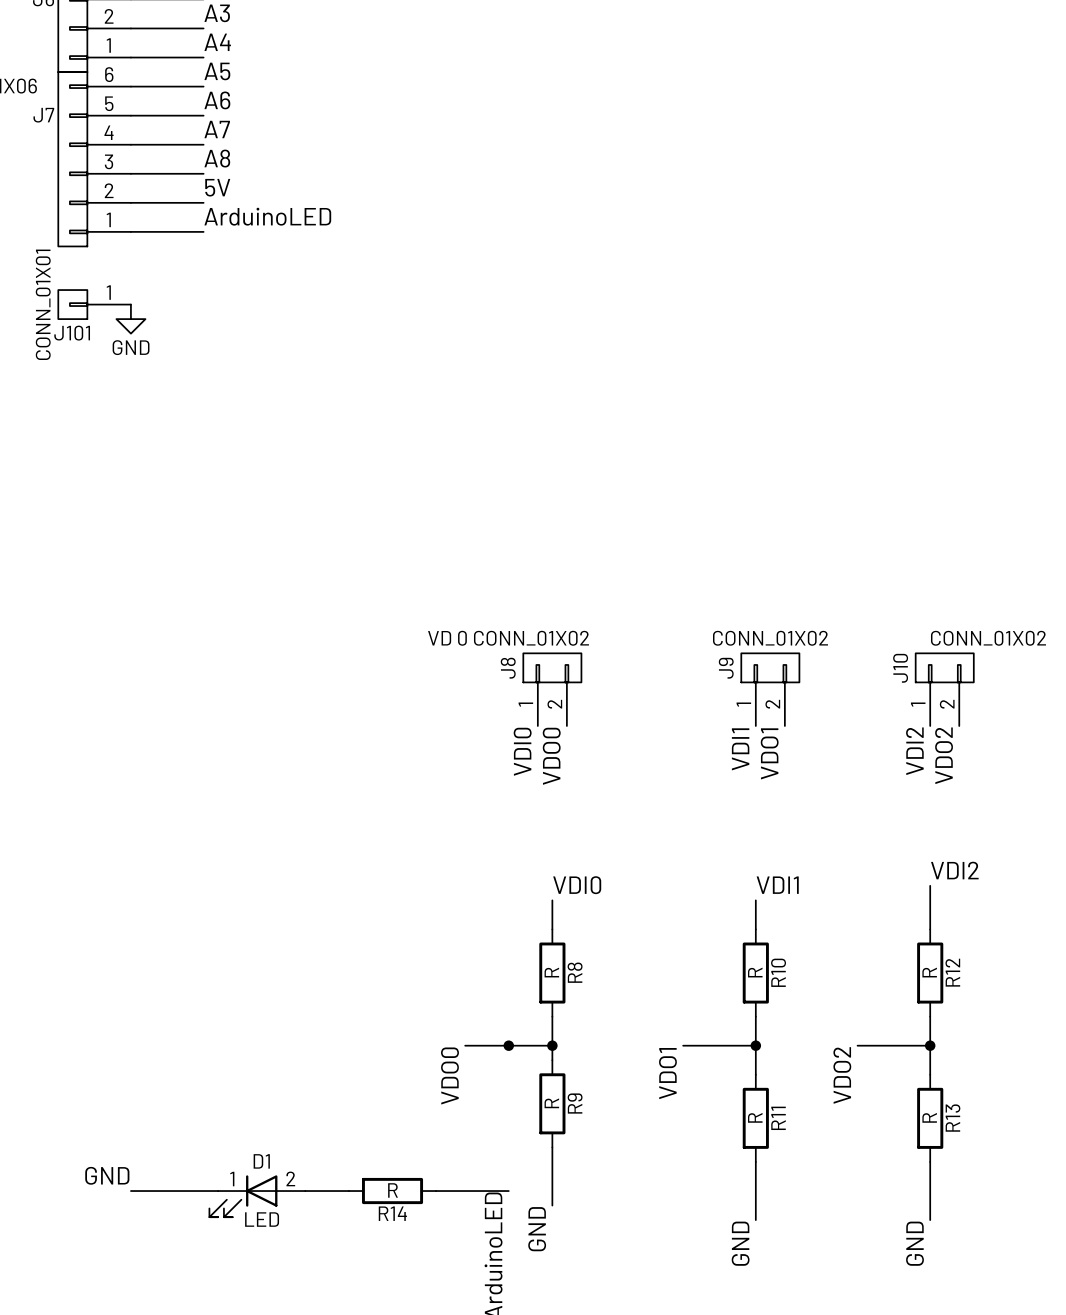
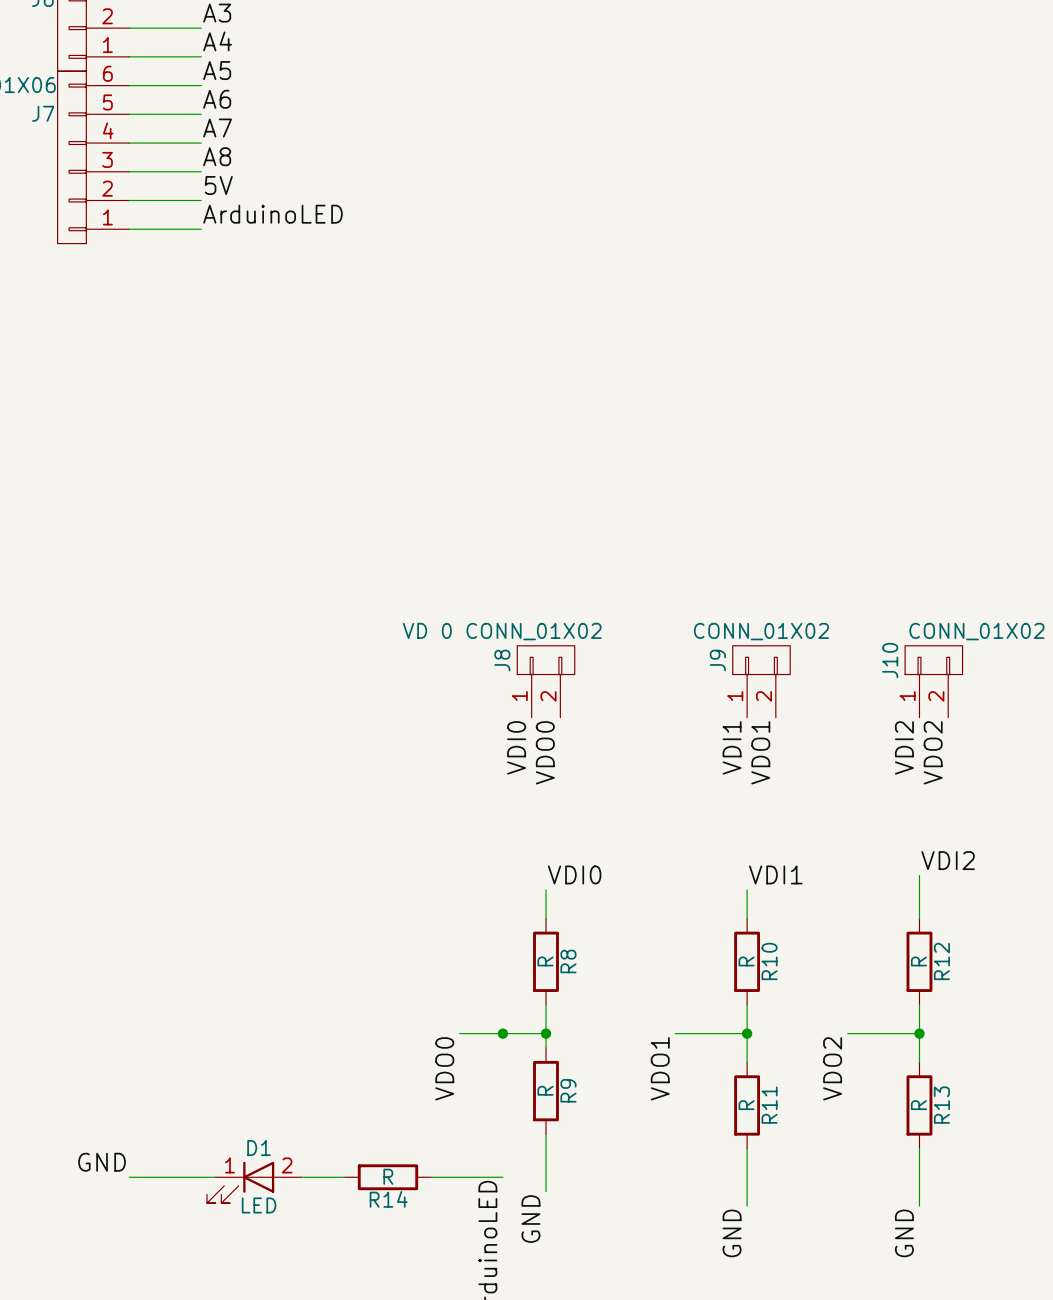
J101: CONN_01X01 (94, 304) -> none
power symbol: GND (130, 319) -> none

